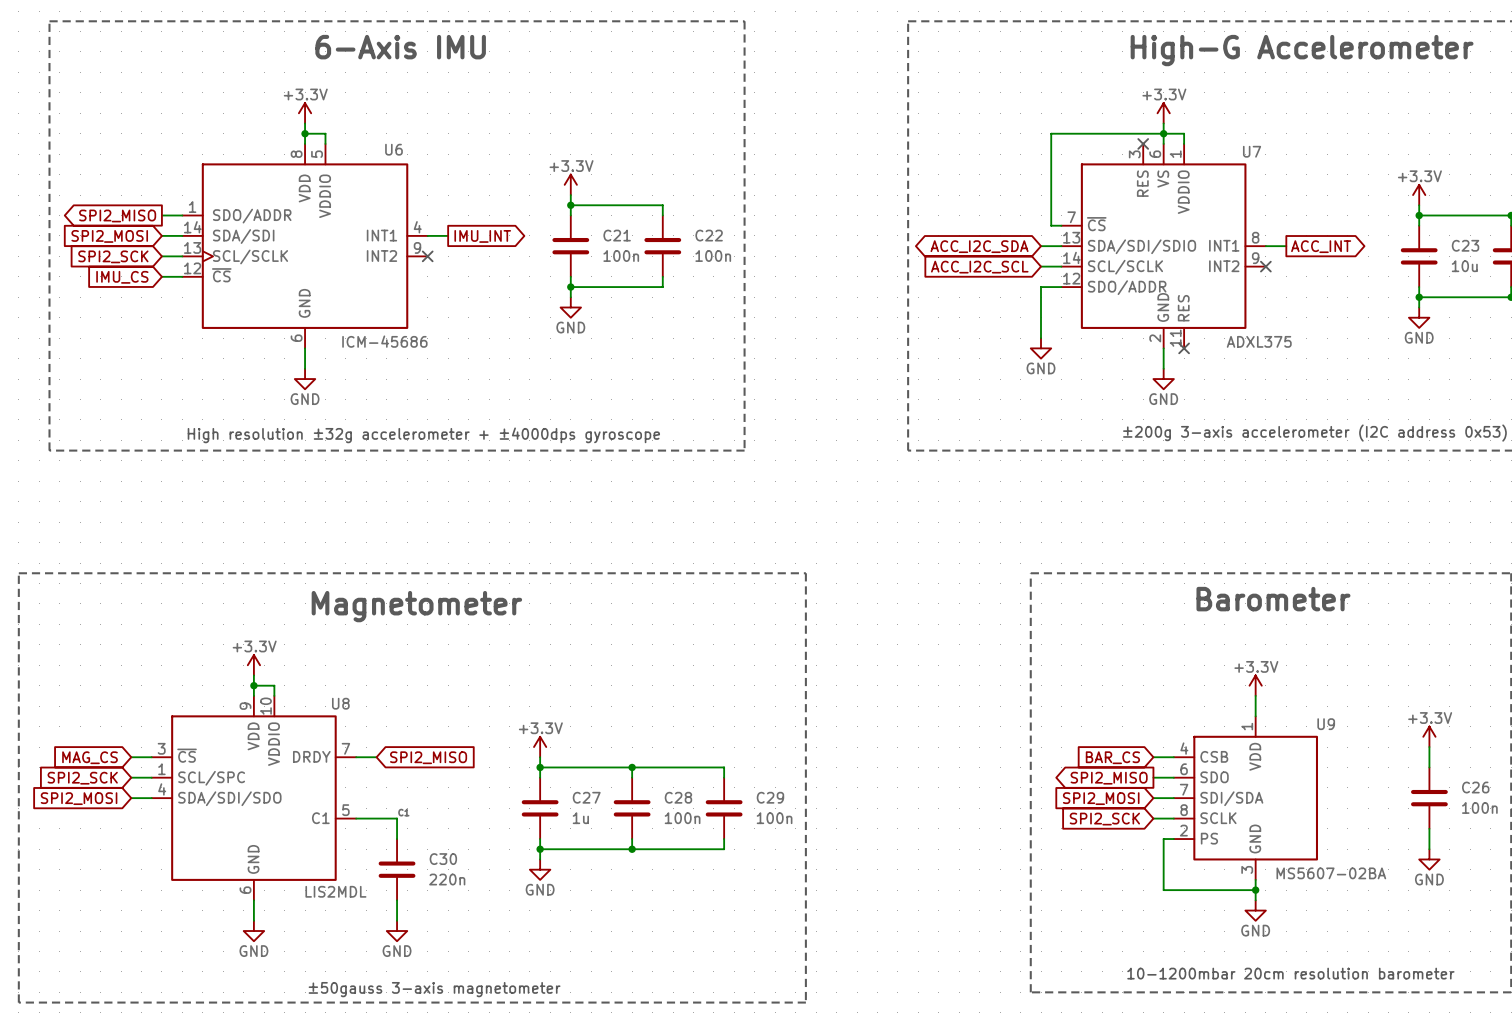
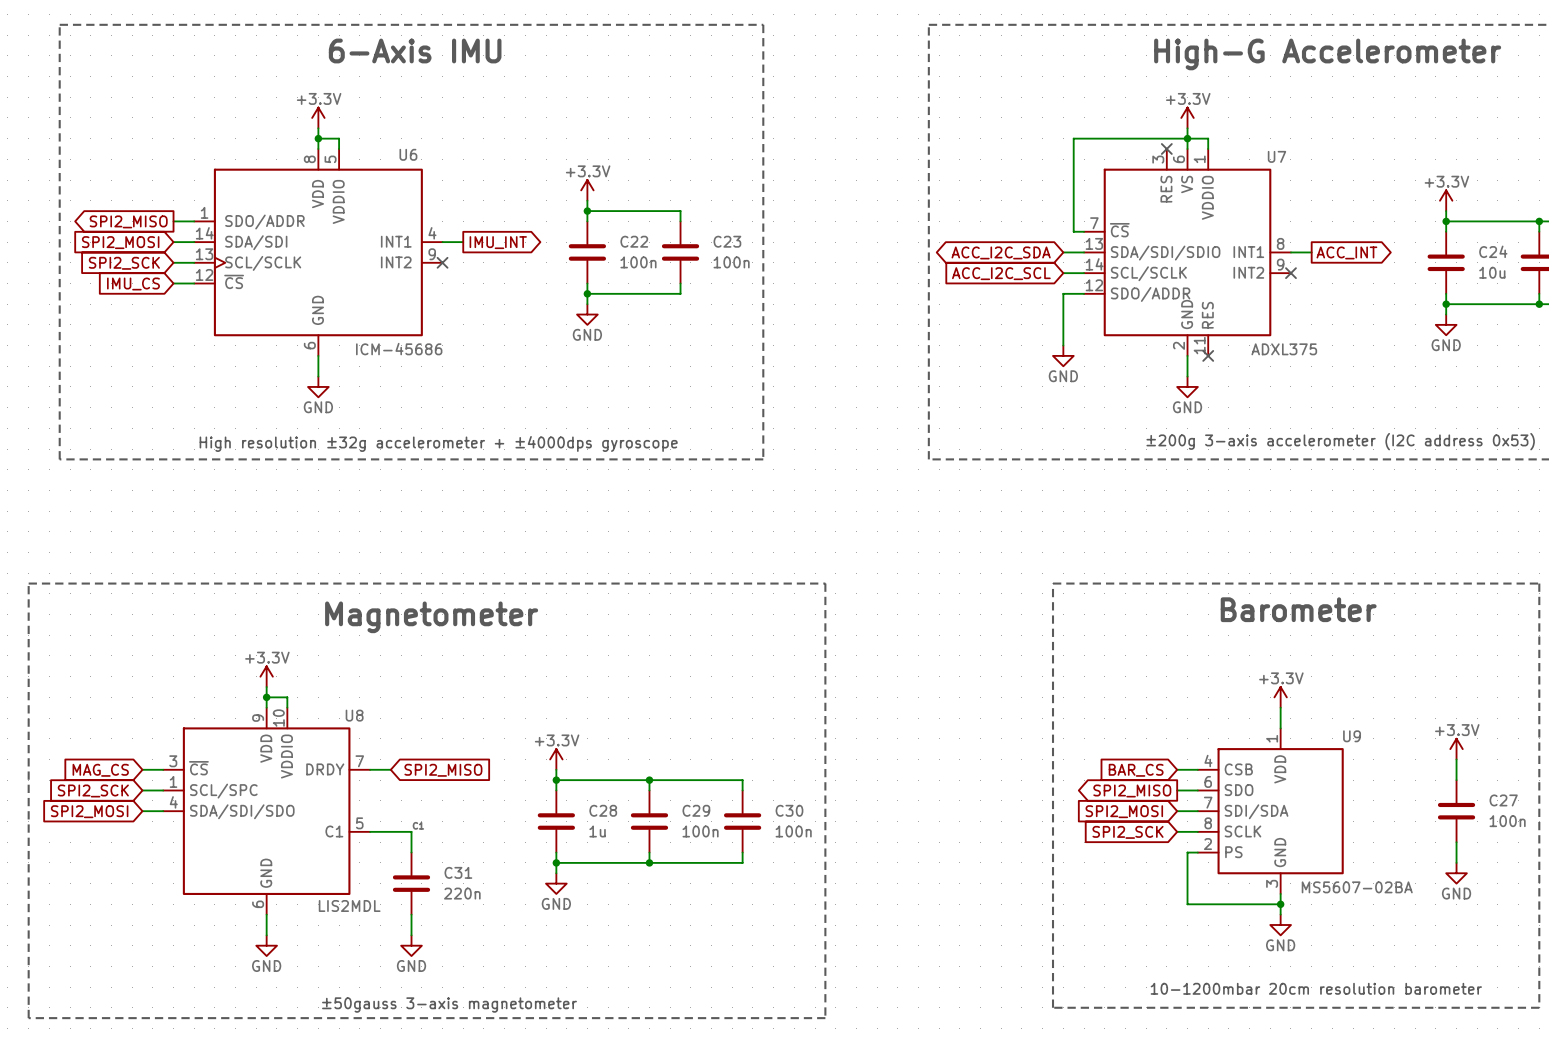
C21 name: C21 (617, 235) -> C22 (634, 241)
C22 name: C22 (709, 235) -> C23 (727, 241)
C23 name: C23 (1465, 245) -> C24 (1493, 251)
C26 name: C26 (1475, 787) -> C27 (1503, 800)
C27 name: C27 (586, 797) -> C28 (603, 810)
C28 name: C28 (678, 797) -> C29 (696, 810)
C29 name: C29 (770, 797) -> C30 (789, 810)
C30 name: C30 (443, 859) -> C31 (458, 872)

